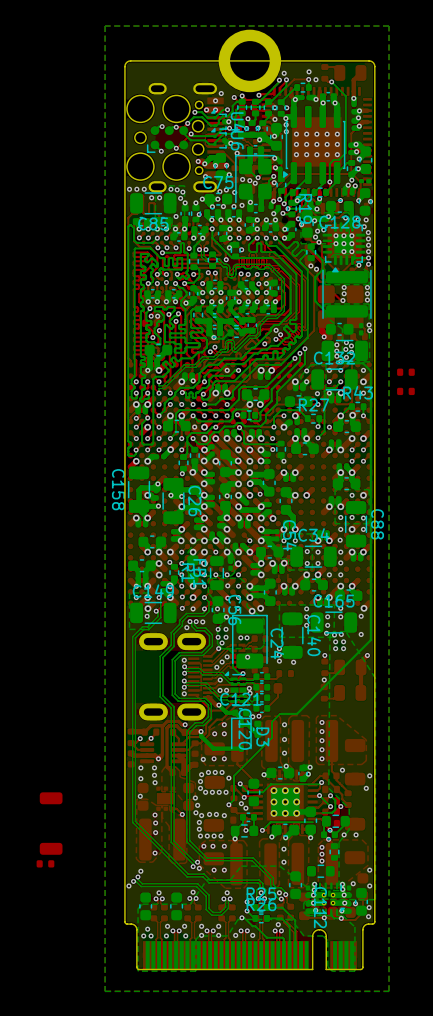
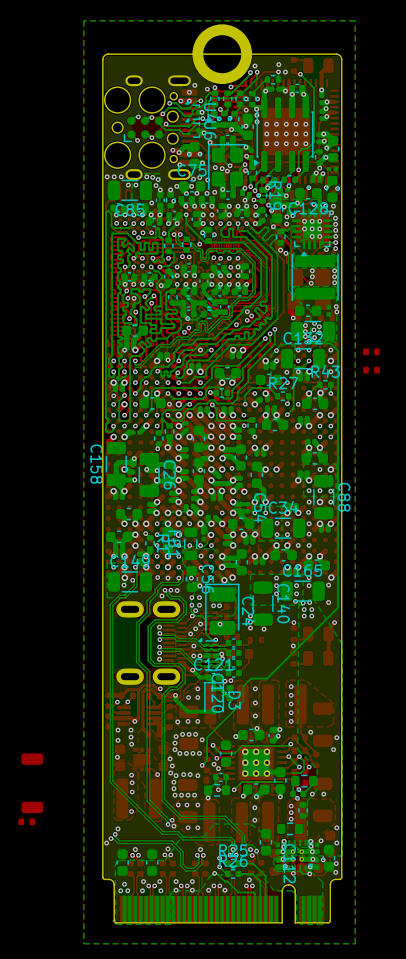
via: none -> (255, 206)
via: (315, 237) -> none
via: none -> (286, 224)
via: none -> (273, 226)
via: (319, 242) -> none
bottom track: (311, 246) (311, 248) (322, 260) (322, 269) (315, 277) (315, 301) (325, 311) -> (296, 226) (283, 230) (283, 233) (291, 240) (291, 251) (288, 253) (288, 290) (294, 293)

